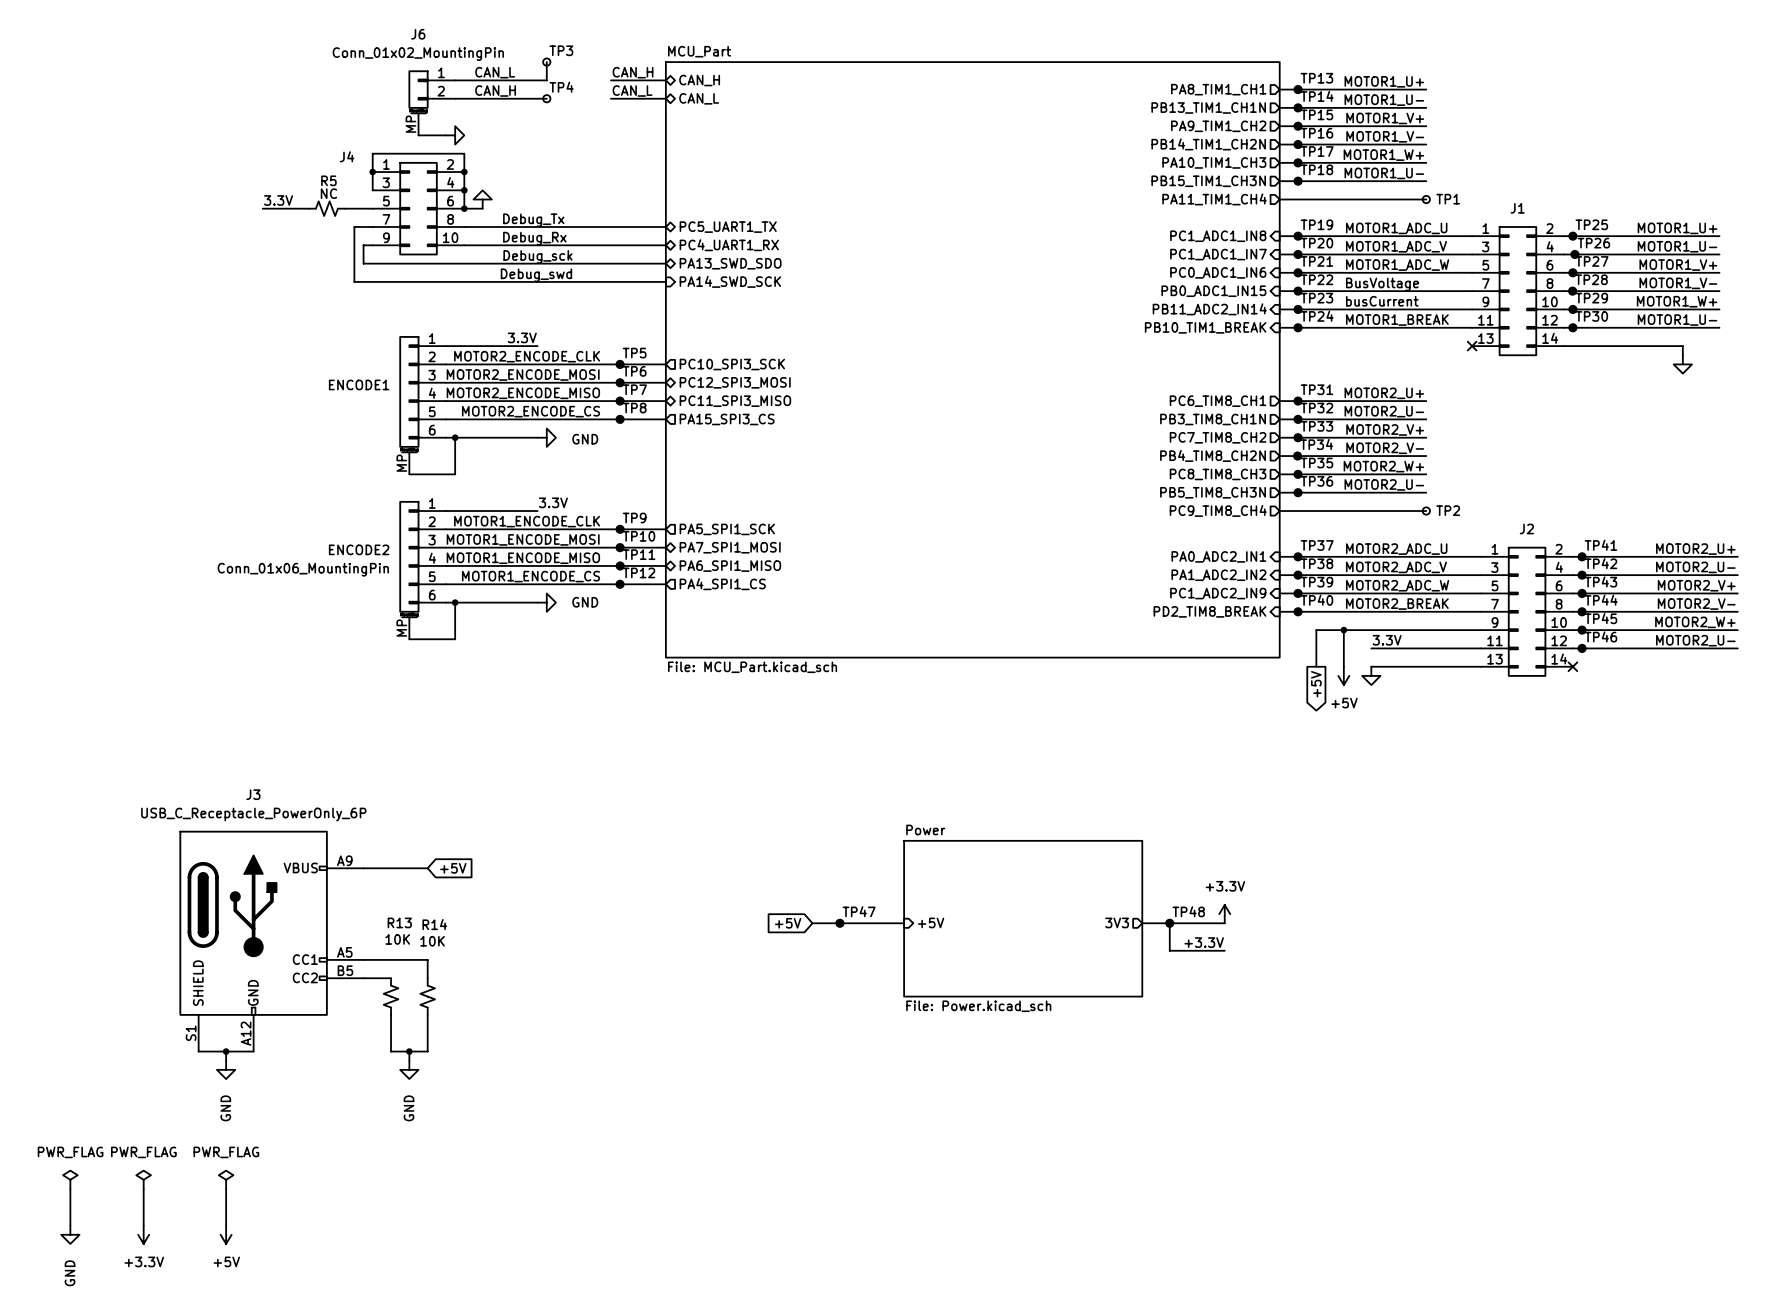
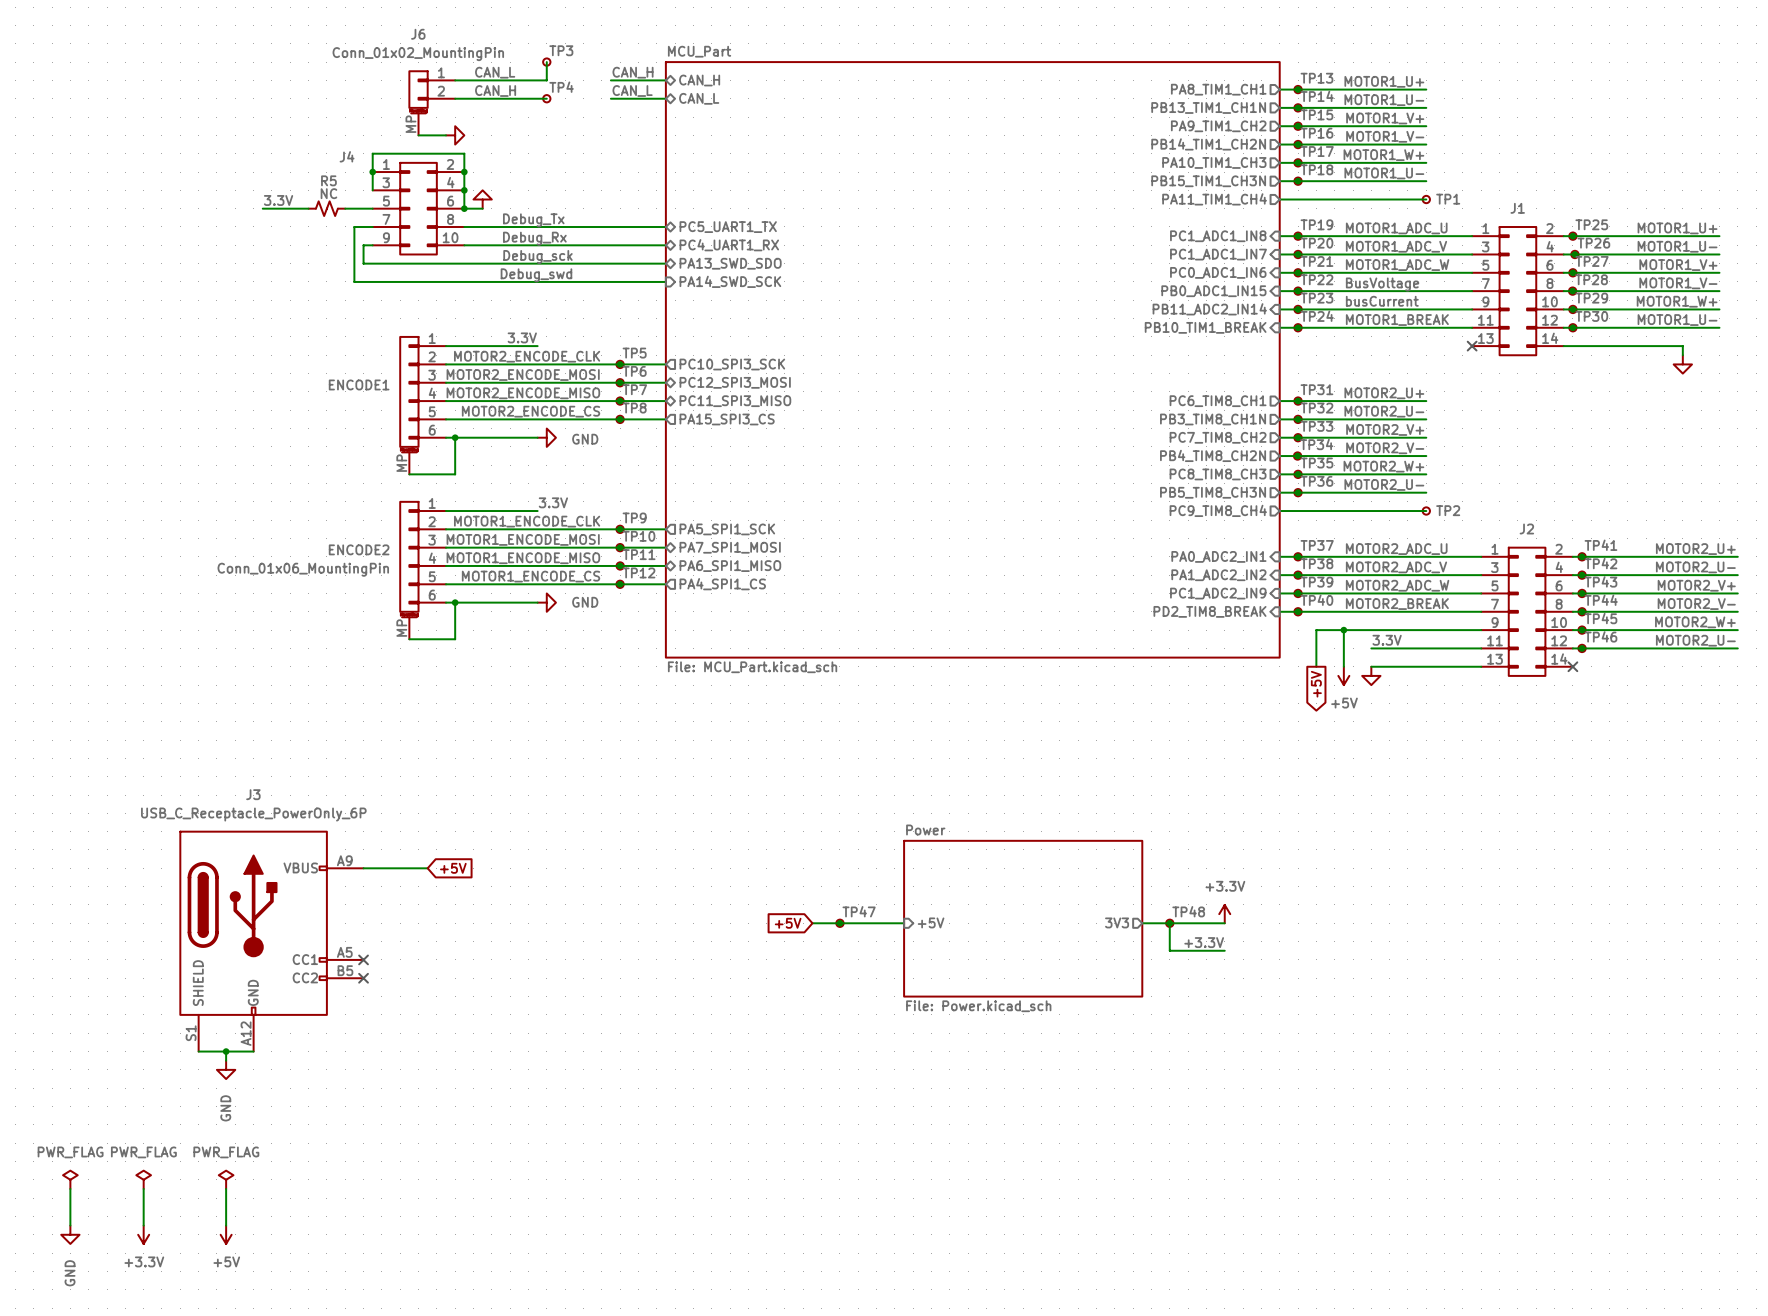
wire: (363, 959) (427, 959) (427, 978) -> none
no-connect mark: none -> (363, 959)
wire: (363, 978) (391, 978) -> none
no-connect mark: none -> (363, 978)
R13: 10K (391, 996) -> none
R14: 10K (427, 996) -> none
wire: (391, 1014) (391, 1051) (427, 1051) (427, 1014) -> none
wire: (409, 1051) (409, 1060) -> none
junction: (409, 1051) -> none
power symbol: GND (409, 1069) -> none

